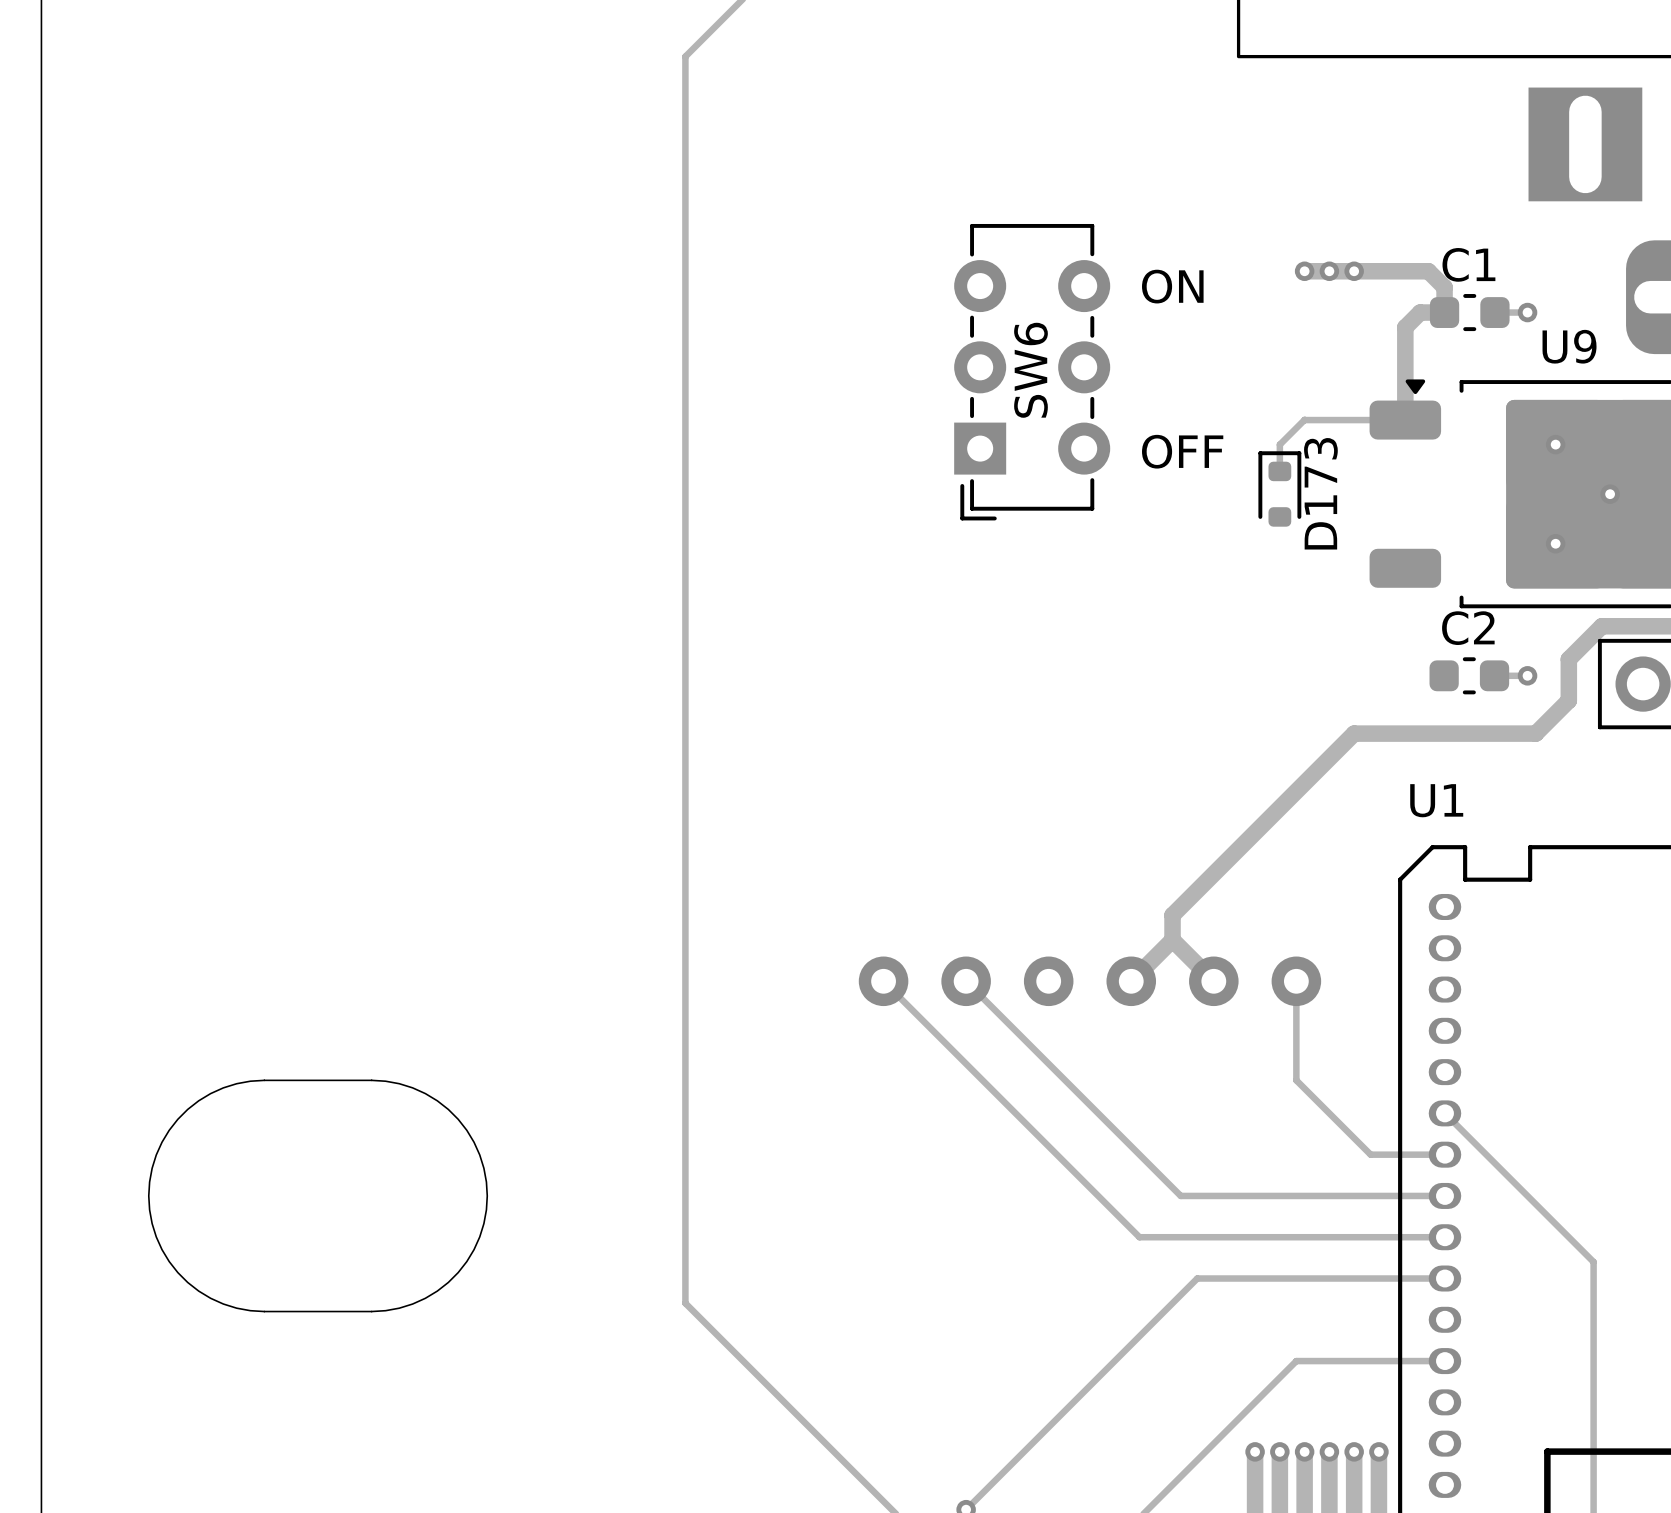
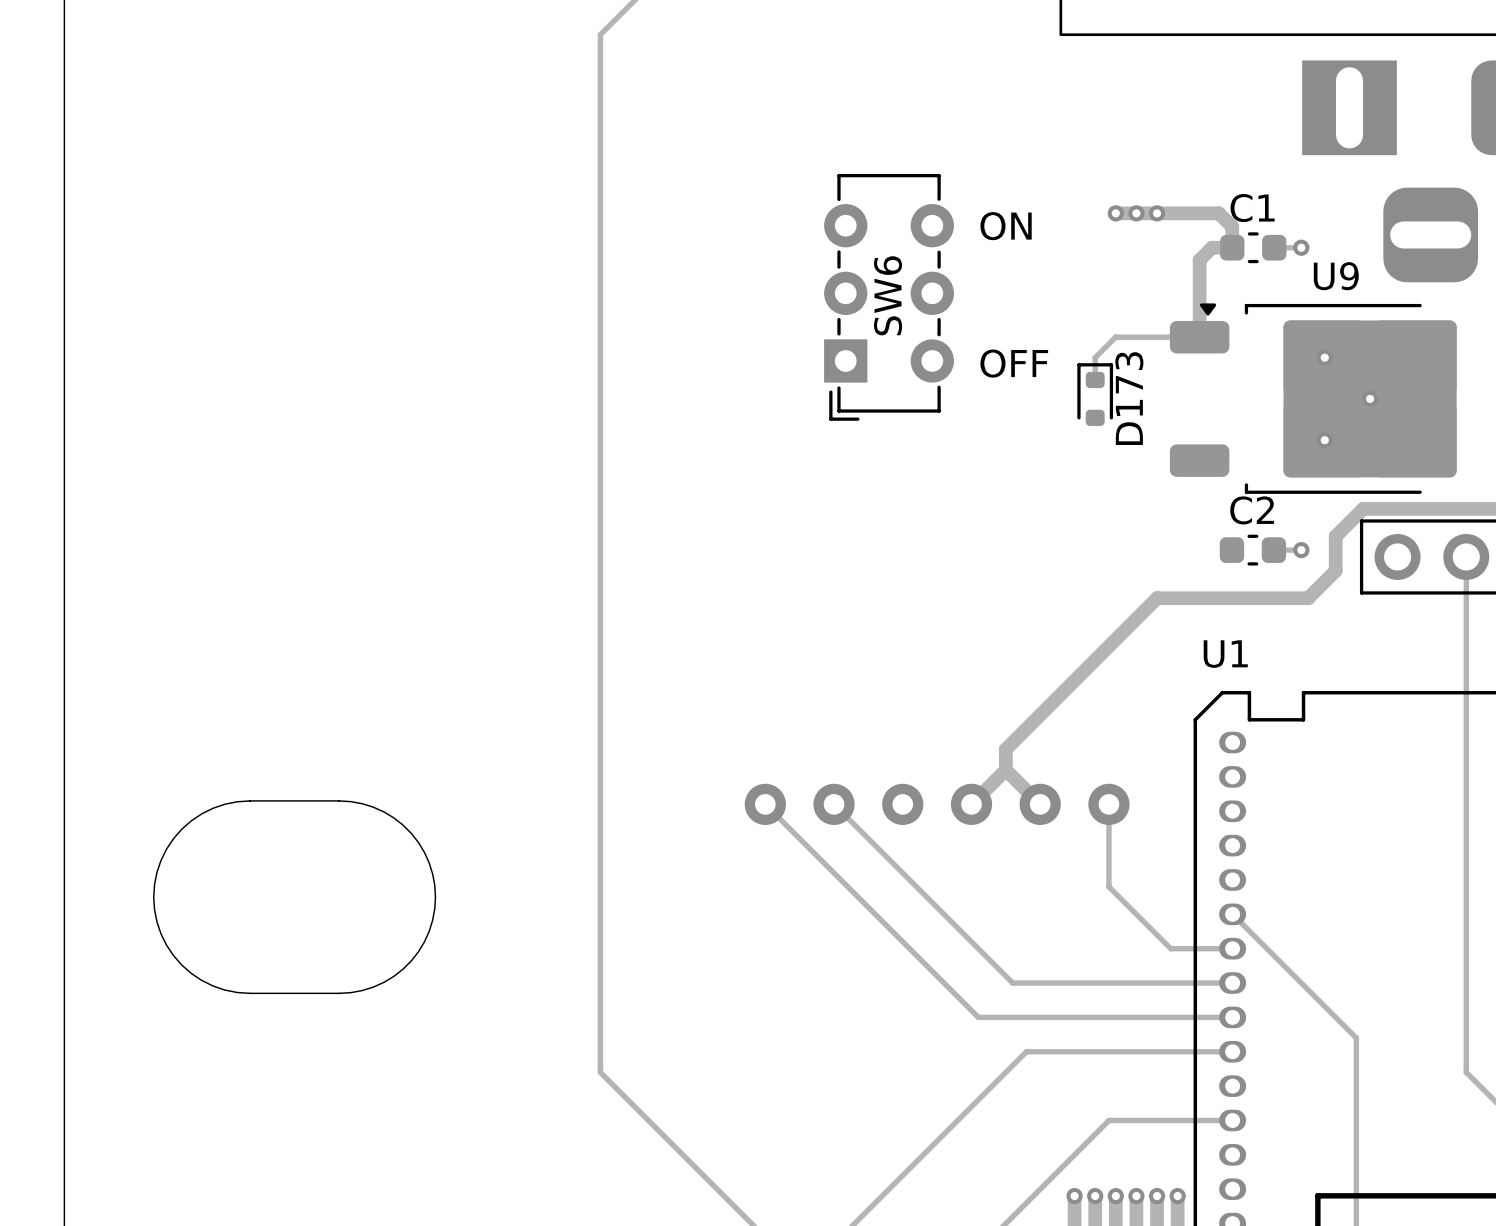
board edge: none -> (249, 800) (339, 800) (362, 803) (393, 817) (411, 833) (429, 863) (435, 897) (432, 920) (424, 941) (403, 969) (373, 987) (350, 992) (249, 993) (225, 990) (213, 986) (201, 980) (181, 965) (173, 955) (161, 933) (154, 909) (154, 884) (161, 860) (173, 838) (181, 829) (201, 813) (225, 804) (249, 800)
board edge: (264, 1080) (371, 1080) (399, 1083) (425, 1093) (437, 1100) (458, 1119) (466, 1130) (479, 1154) (483, 1168) (487, 1195) (483, 1223) (479, 1236) (466, 1261) (448, 1282) (425, 1298) (399, 1308) (385, 1310) (264, 1311) (236, 1308) (223, 1304) (198, 1291) (177, 1272) (162, 1249) (152, 1223) (149, 1209) (149, 1182) (156, 1154) (162, 1142) (177, 1119) (198, 1100) (223, 1087) (236, 1083) (264, 1080) -> none

